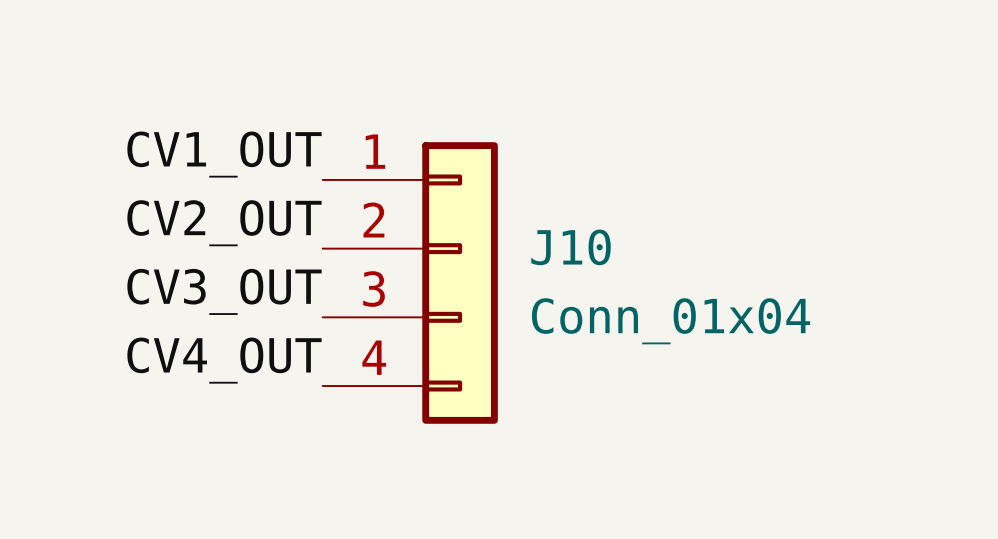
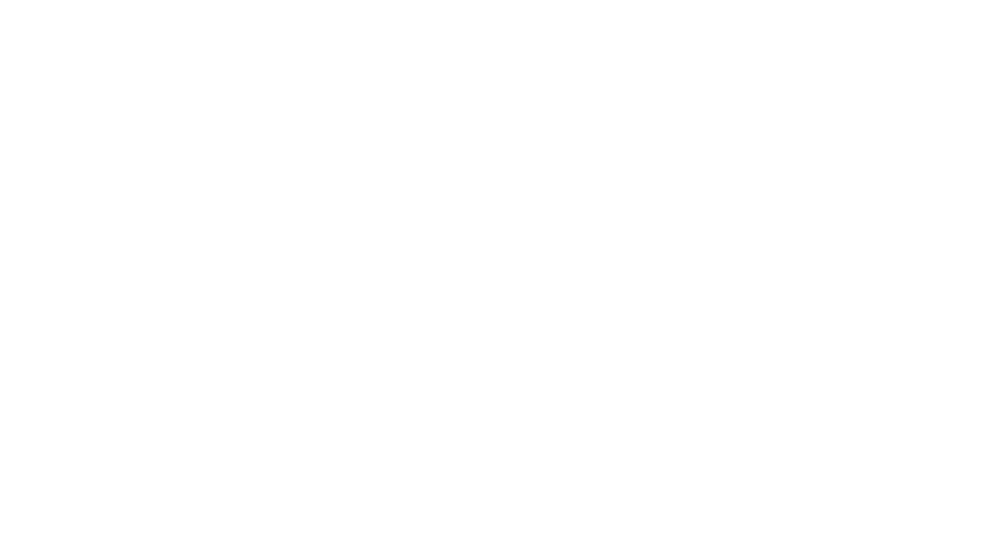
label: CV1_OUT (224, 154) -> none
label: CV2_OUT (224, 223) -> none
J10: Conn_01x04 (410, 282) -> none
label: CV3_OUT (224, 291) -> none
label: CV4_OUT (224, 360) -> none

